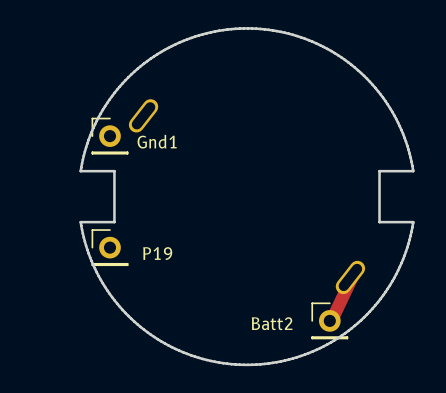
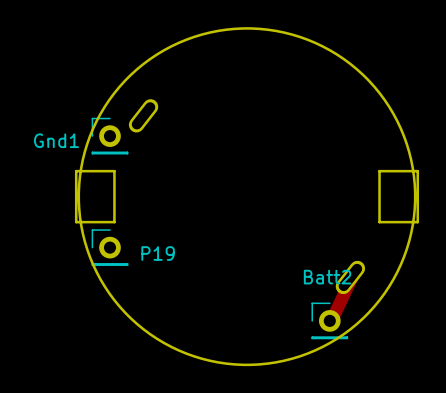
round board edge: none -> [77, 27, 417, 367]
Gnd1 name position: Gnd1 (157, 141) -> Gnd1 (56, 140)
board edge: (80, 171) (88, 139) (100, 113) (117, 89) (137, 68) (161, 52) (191, 37) (219, 30) (248, 28) (276, 31) (304, 38) (334, 53) (357, 70) (378, 91) (394, 115) (405, 141) (413, 171) -> (80, 171) (76, 171) (76, 222) (80, 222)
board edge: (80, 222) (88, 253) (100, 279) (117, 303) (137, 324) (161, 341) (191, 355) (219, 362) (248, 364) (276, 362) (304, 354) (334, 340) (357, 323) (378, 302) (394, 278) (405, 251) (413, 222) -> (413, 171) (417, 171) (417, 222) (413, 222)
Batt2 name position: Batt2 (272, 323) -> Batt2 (327, 277)

